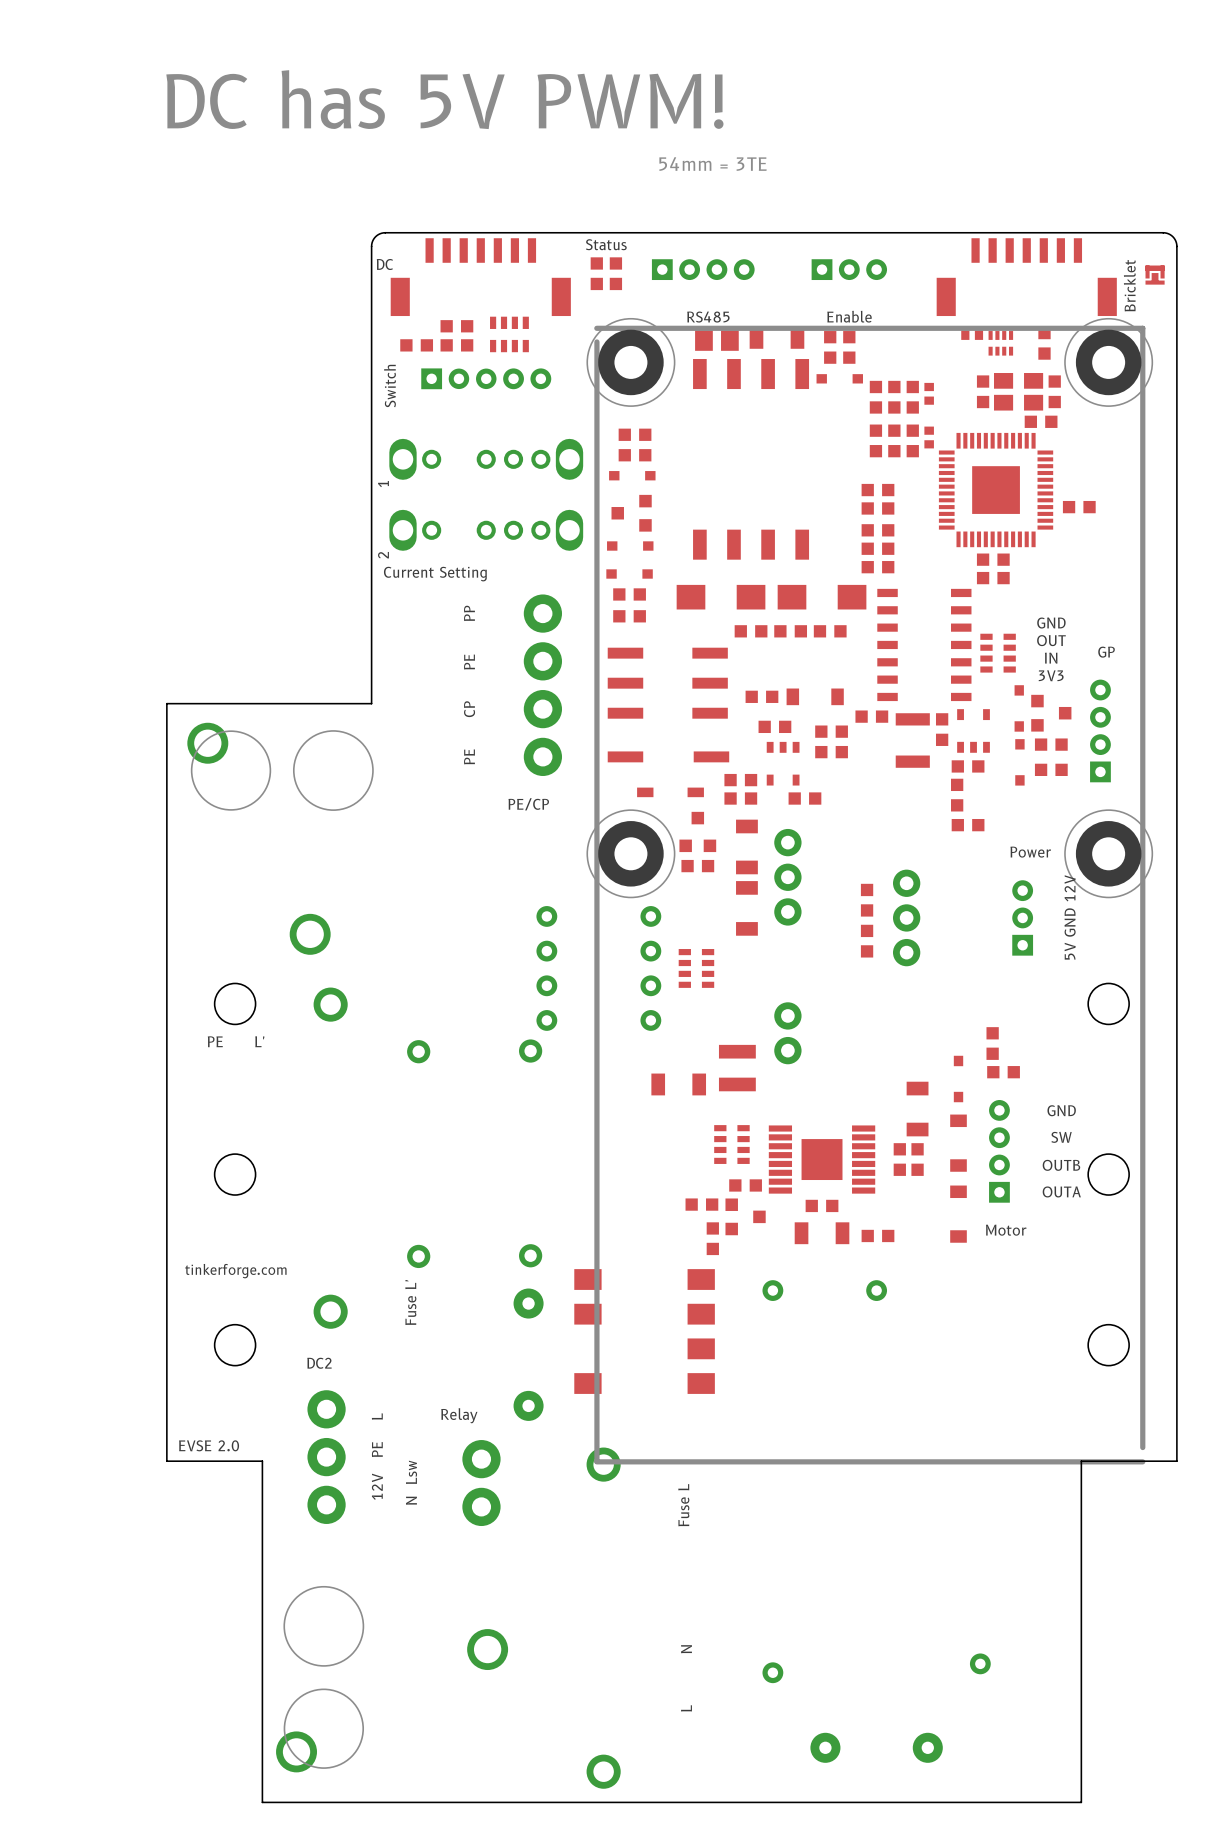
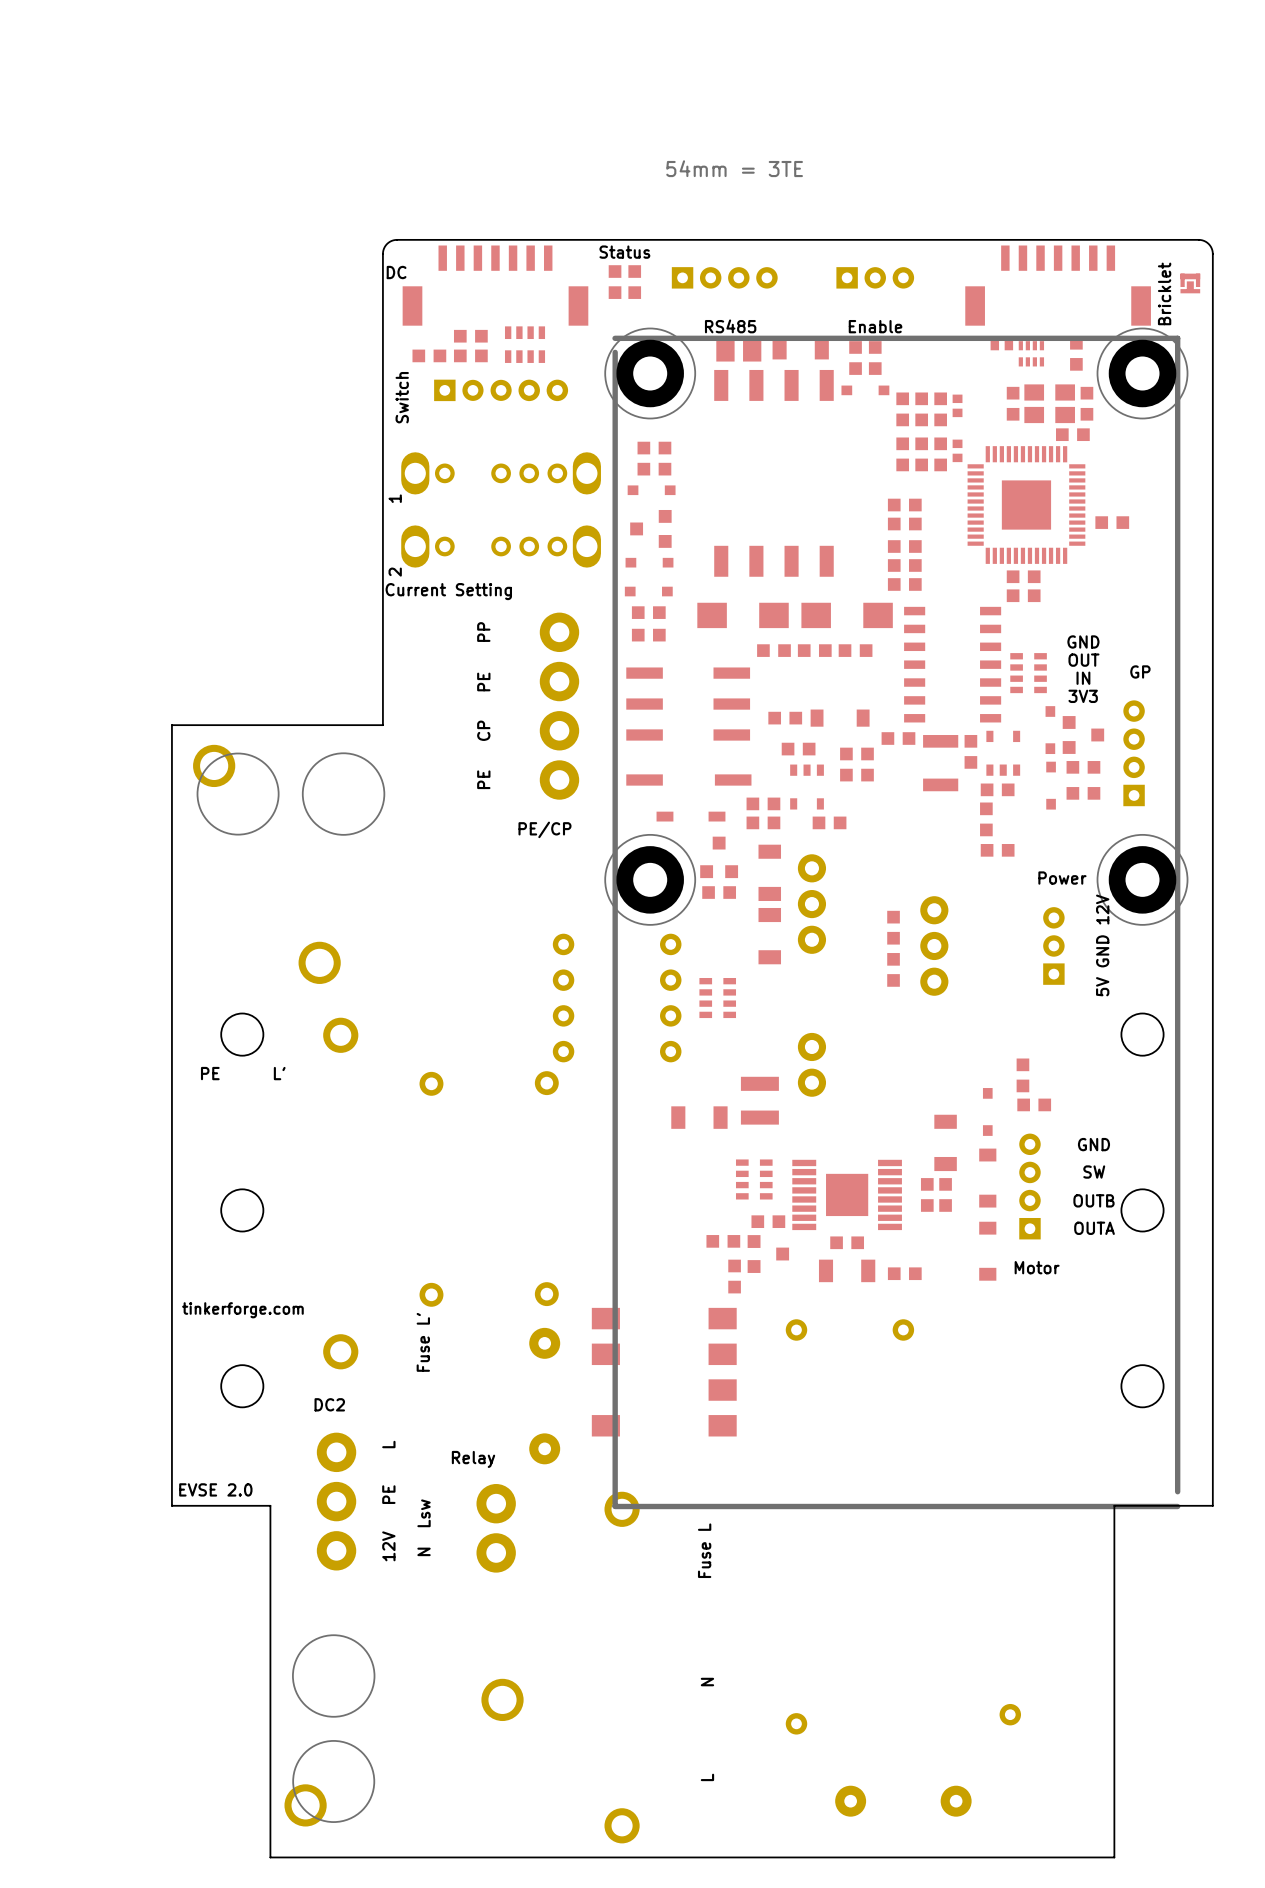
text: DC has 5V PWM! (444, 99) -> none

